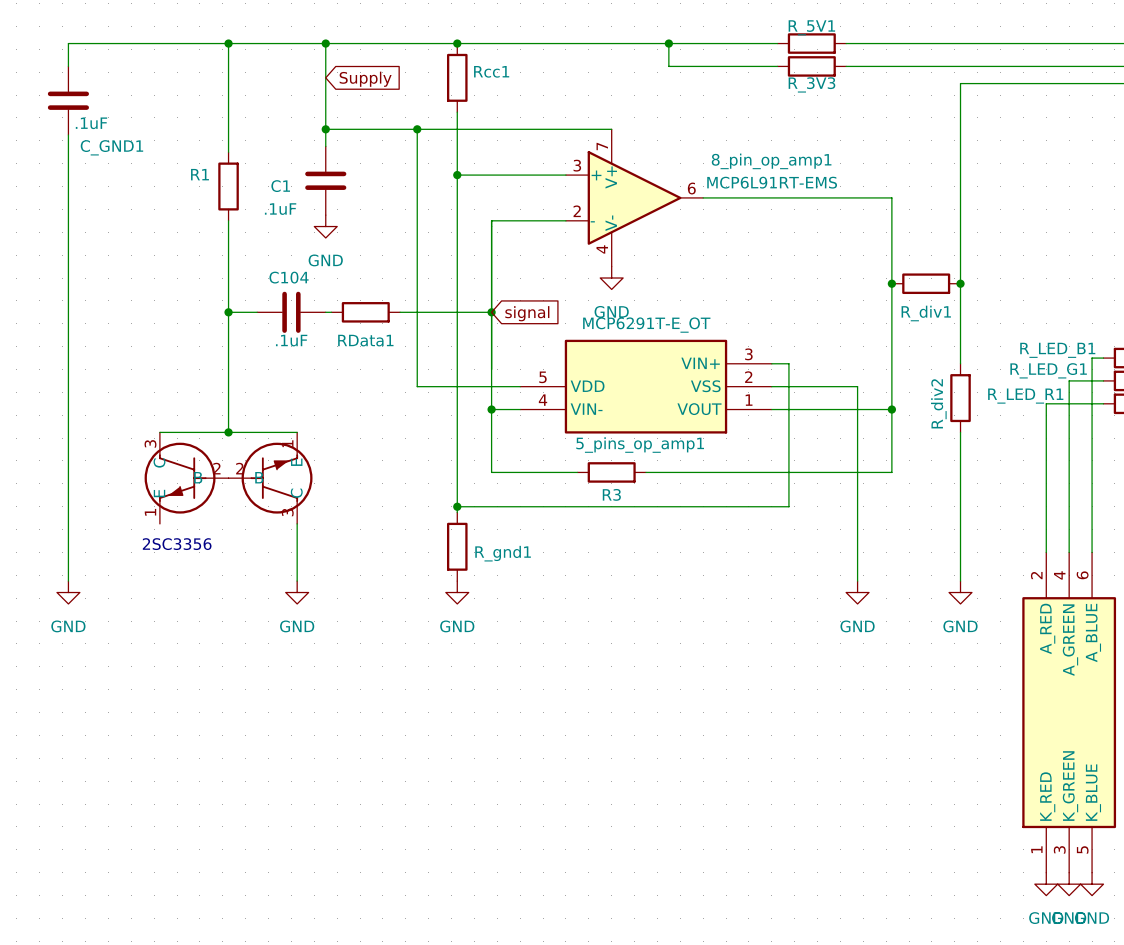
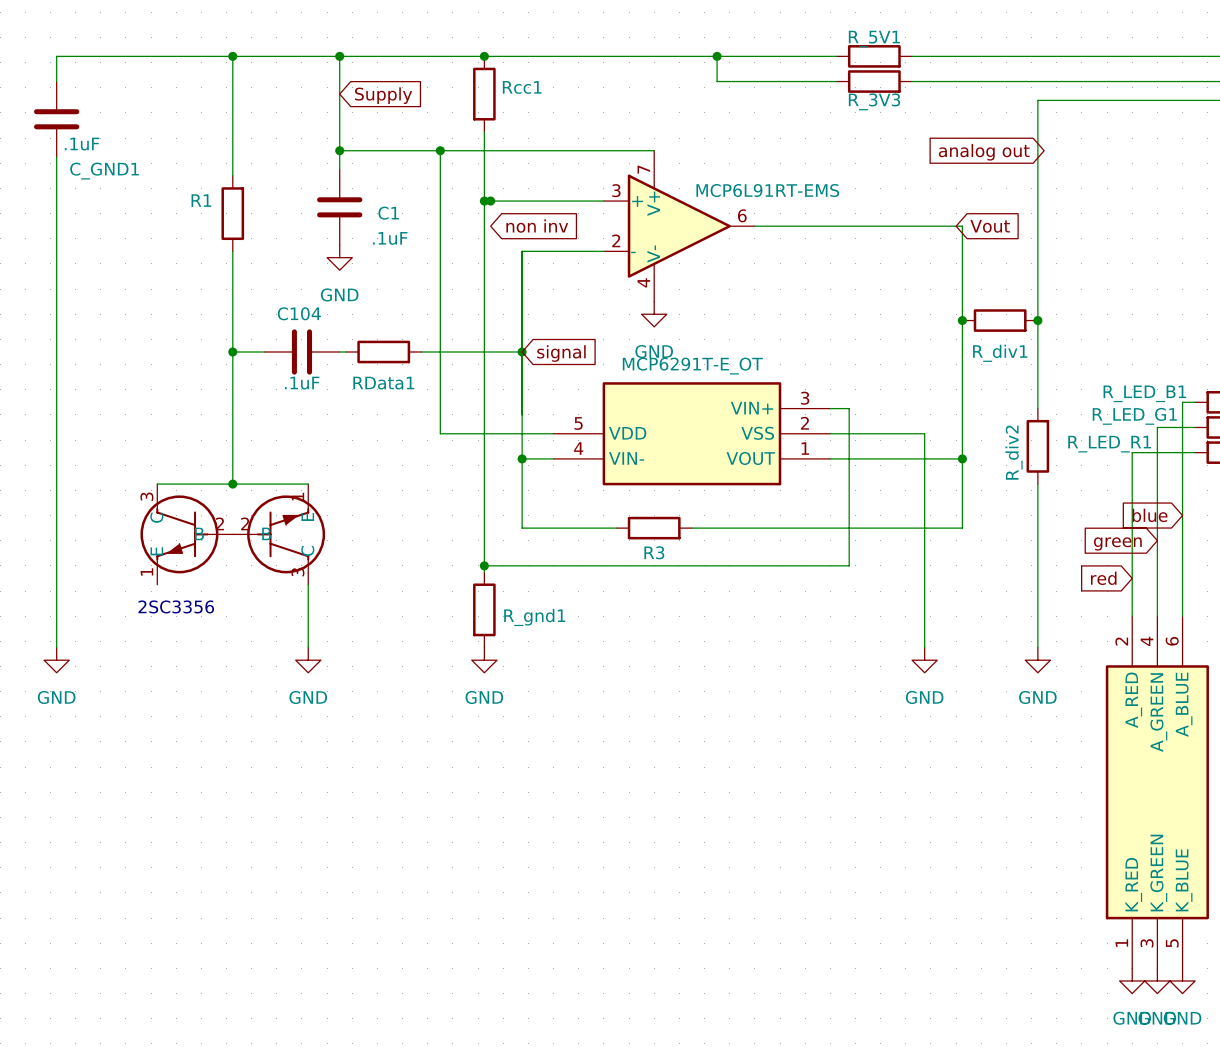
global label: none -> analog out (984, 152)
8_pin_op_amp1 name: 8_pin_op_amp1 (771, 161) -> none
junction: none -> (490, 201)
8_pin_op_amp1 value position: MCP6L91RT-EMS (772, 182) -> MCP6L91RT-EMS (767, 190)
C1 name position: C1 (280, 186) -> C1 (388, 213)
global label: none -> non inv (537, 226)
global label: none -> Vout (990, 226)
C1 value position: .1uF (280, 209) -> .1uF (390, 238)
5_pins_op_amp1 name: 5_pins_op_amp1 (640, 445) -> none
global label: none -> blue (1150, 515)
global label: none -> green (1117, 543)
global label: none -> red (1103, 578)

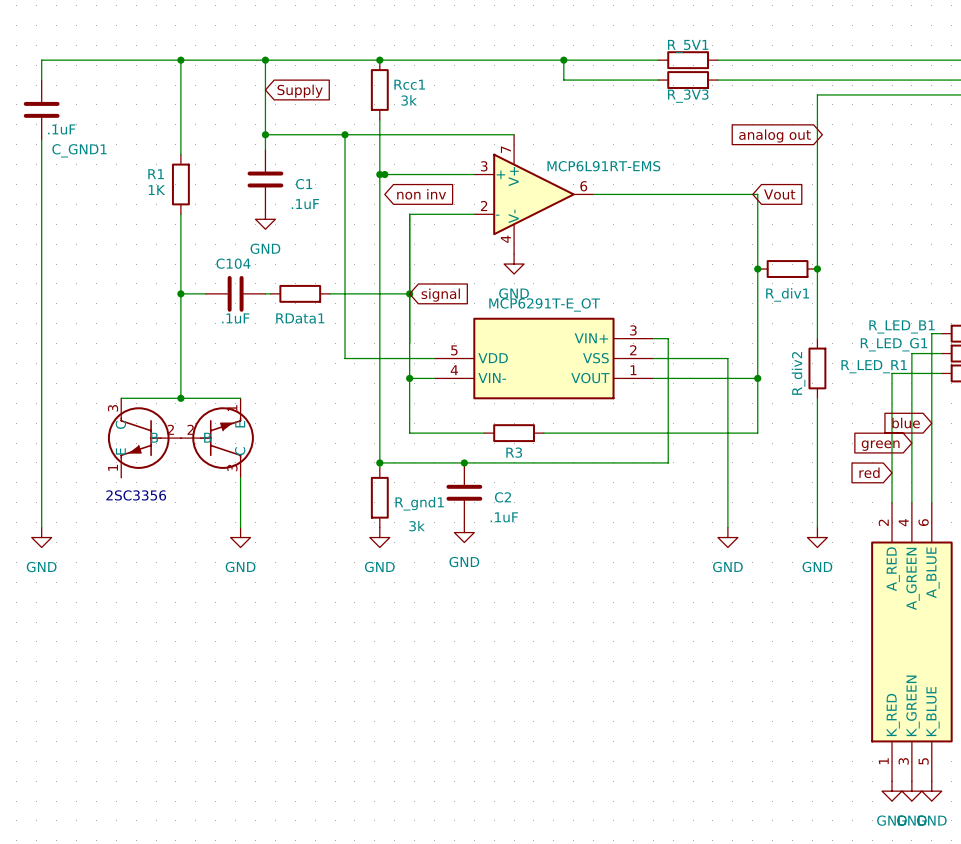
Rcc1 value: none -> 3k (409, 100)
R1 value: none -> 1K (156, 190)
junction: none -> (464, 462)
C2: none -> .1uF (464, 492)
R_gnd1 value: none -> 3k (417, 526)
power symbol: none -> GND (464, 532)

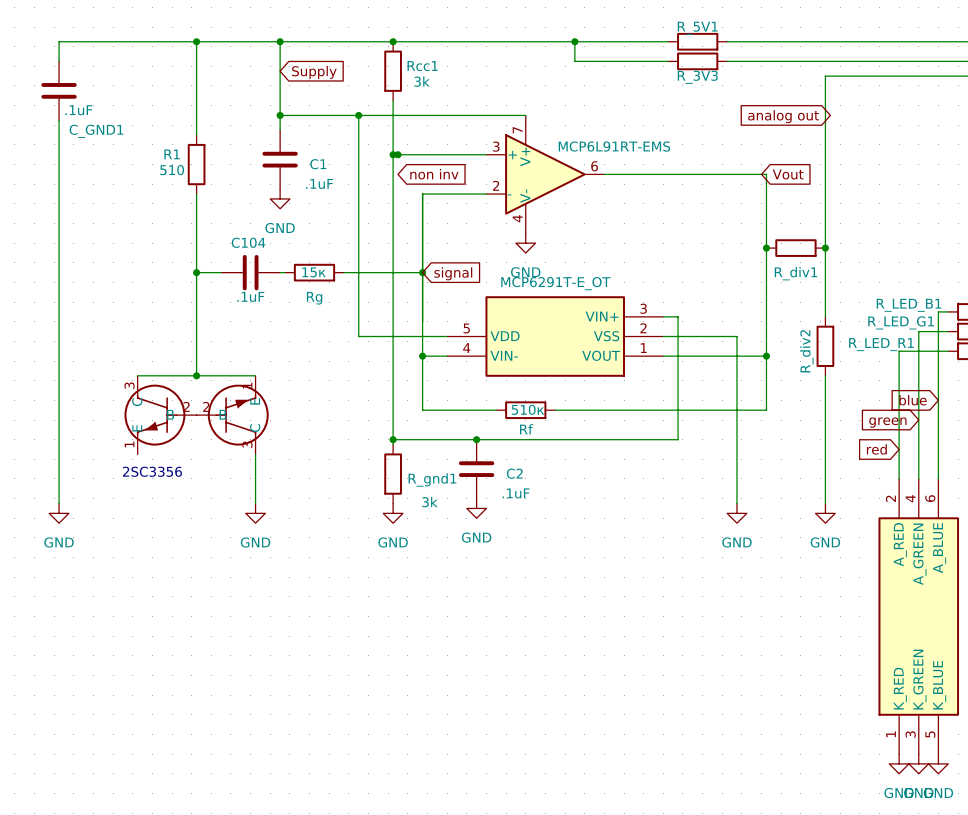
R1 value: 1K (156, 190) -> 510 (172, 170)
RData1 value: none -> 15к (314, 272)
RData1 name: RData1 (300, 318) -> Rg (314, 298)
R3 value: none -> 510к (528, 409)
R3 name: R3 (514, 452) -> Rf (526, 429)

